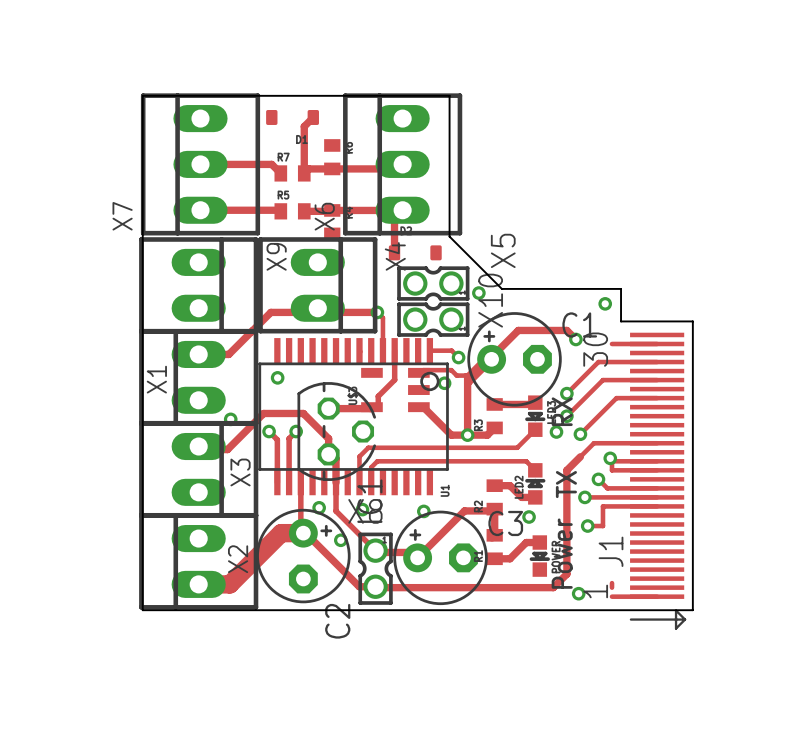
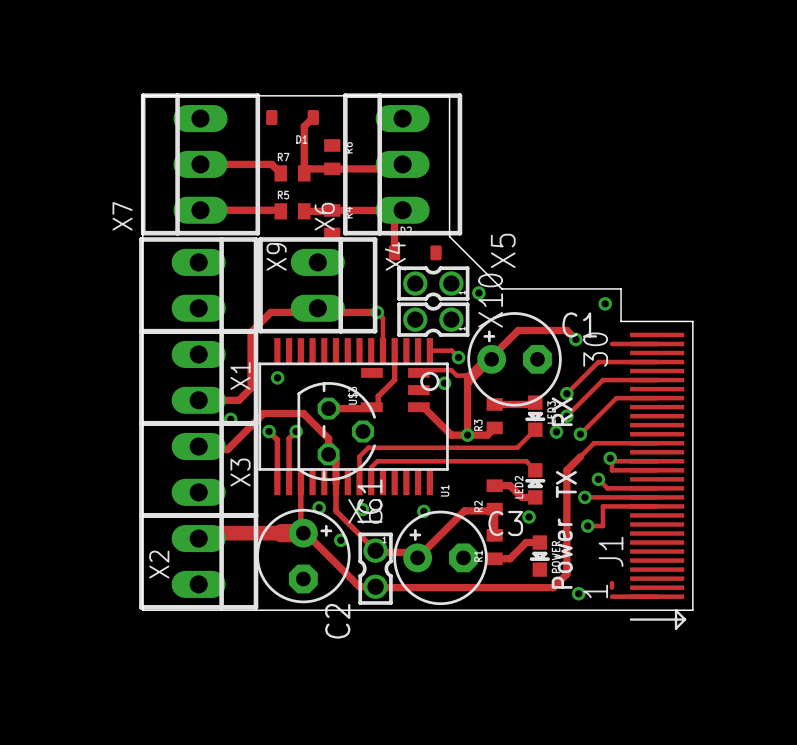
track: (251, 332) (228, 354) (198, 354) -> (251, 332) (251, 388) (238, 400) (198, 400)
X1 rotation: 0° (198, 377) -> 180° (198, 377)
track: (281, 533) (229, 584) (198, 584) -> (281, 533) (204, 533) (198, 538)
X2 rotation: 0° (198, 561) -> 180° (198, 561)

